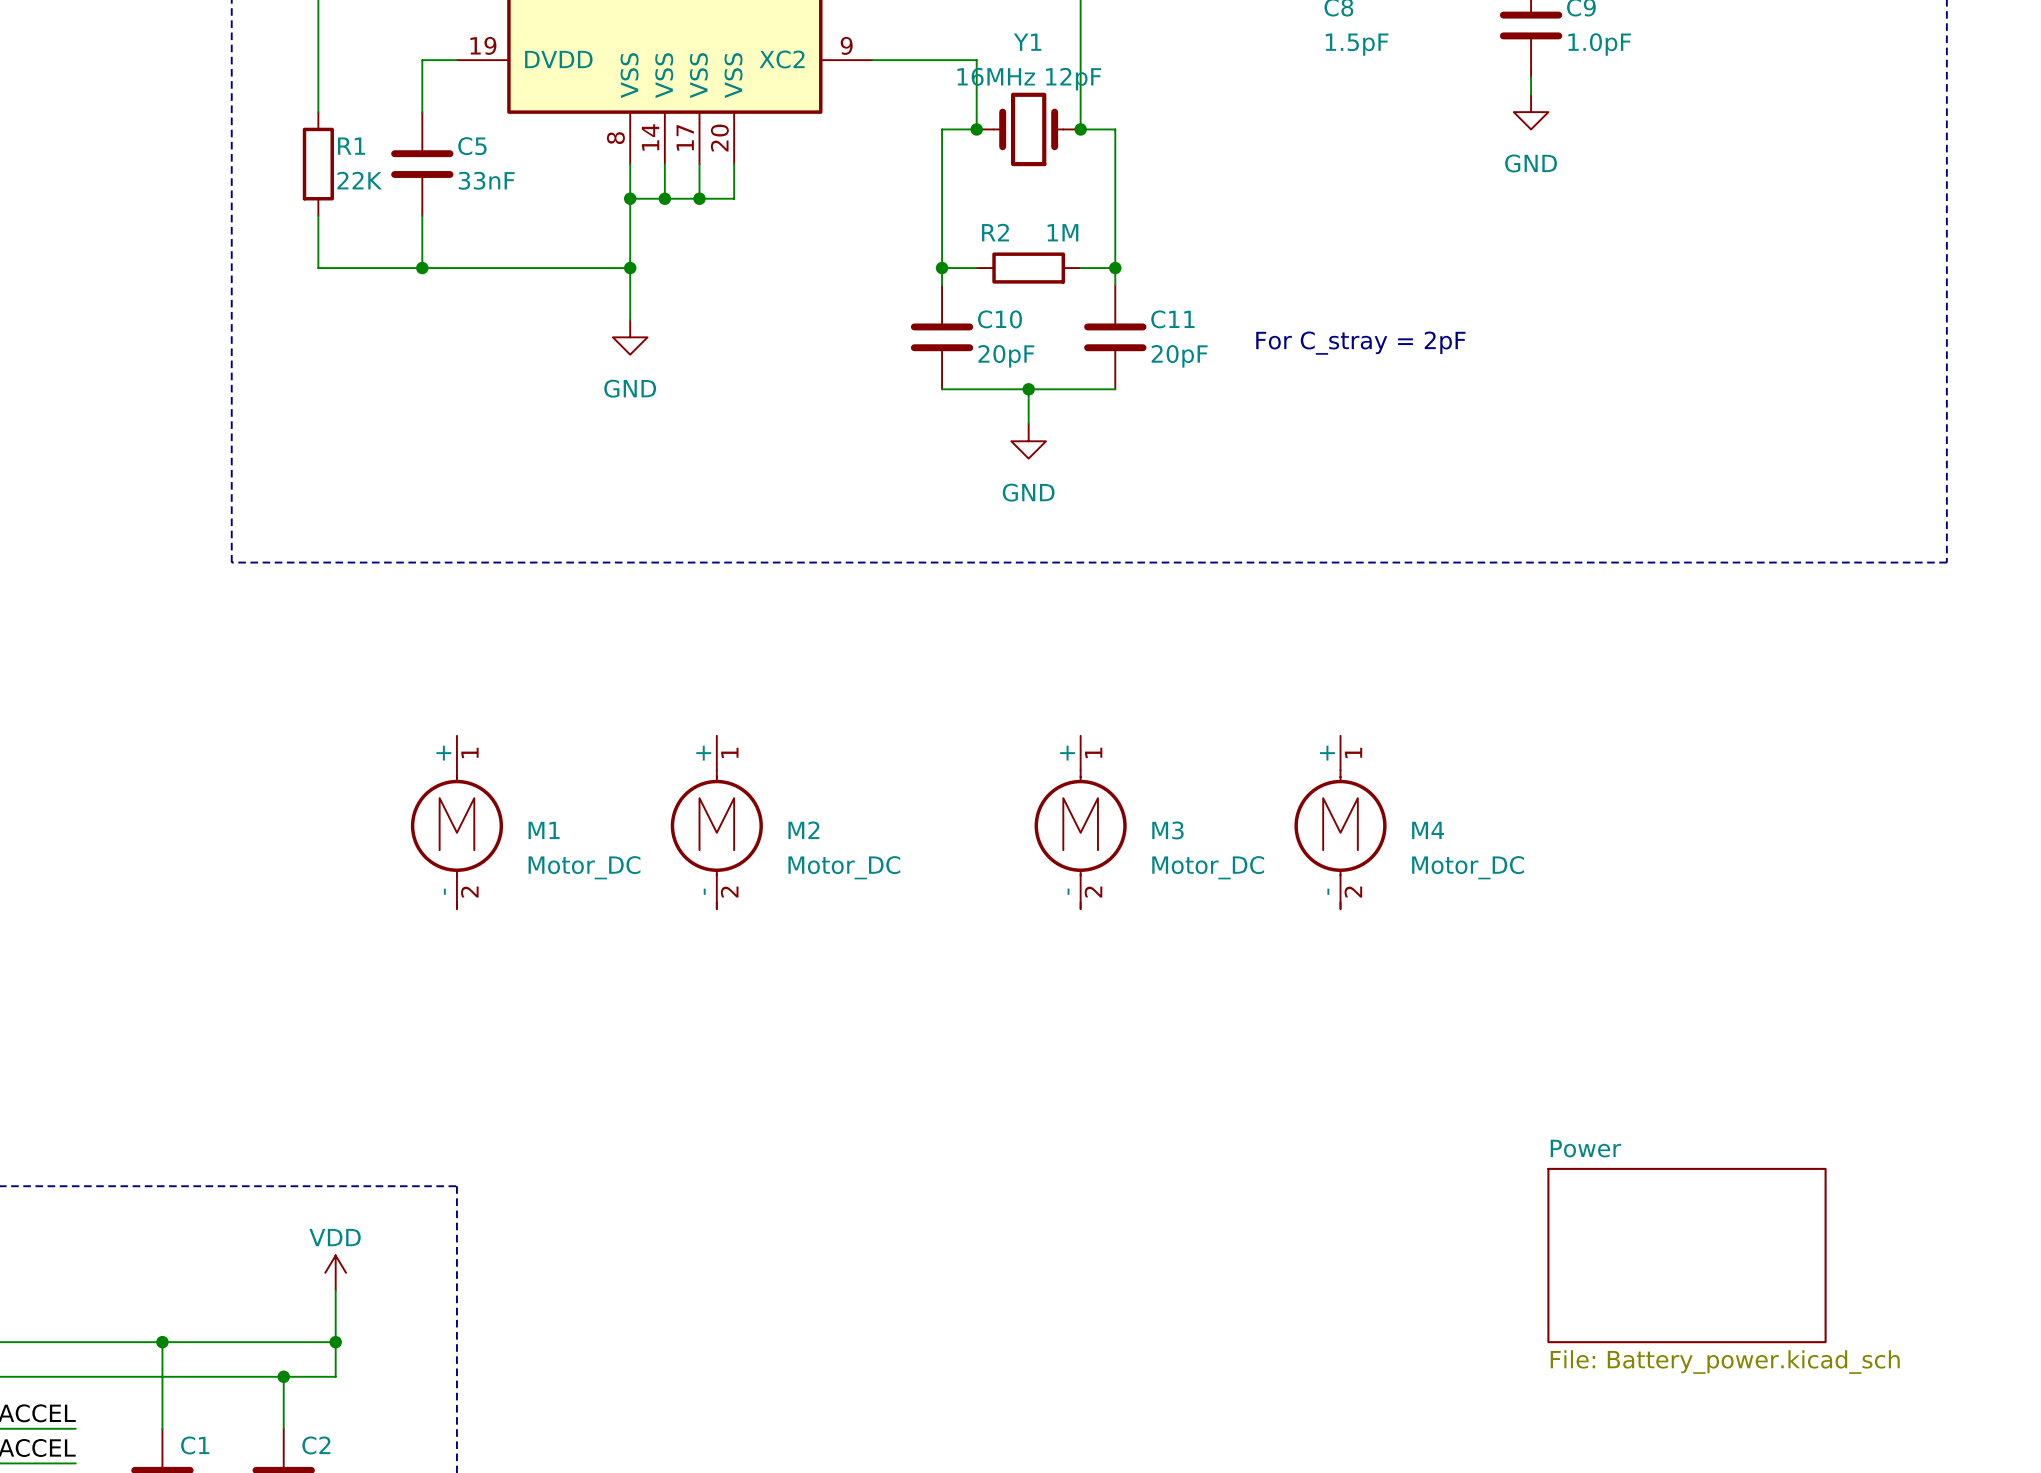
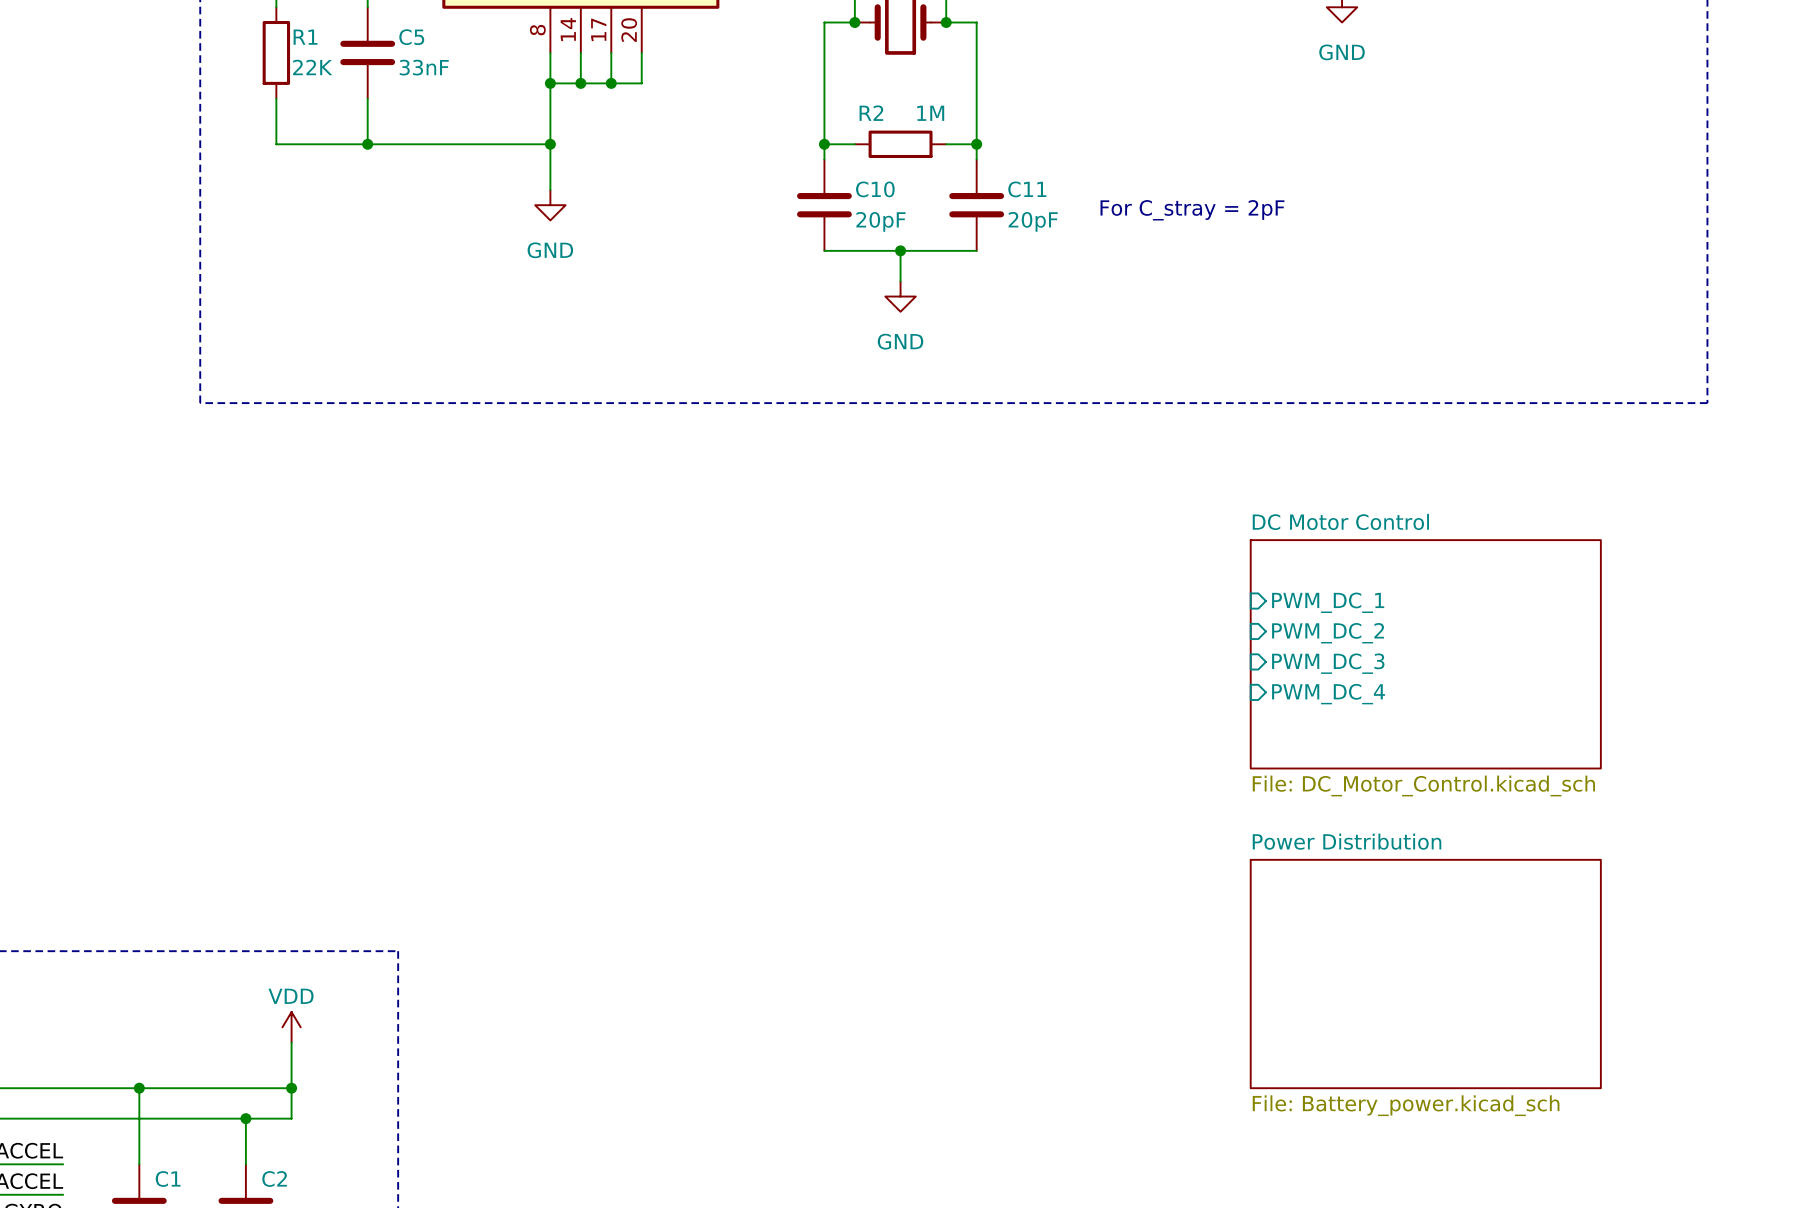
sheet pin: none -> PWM_DC_1 (1328, 602)
M1: Motor_DC (456, 822) -> none
M2: Motor_DC (716, 822) -> none
M3: Motor_DC (1080, 822) -> none
M4: Motor_DC (1340, 822) -> none
sheet pin: none -> PWM_DC_2 (1328, 633)
sheet DC Motor Control: none -> File: DC_Motor_Control.kicad_sch (1425, 654)
sheet pin: none -> PWM_DC_3 (1328, 663)
sheet pin: none -> PWM_DC_4 (1328, 694)
sheet Power Distribution: none -> File: Battery_power.kicad_sch (1425, 974)
sheet Power: File: Battery_power.kicad_sch (1687, 1255) -> none

